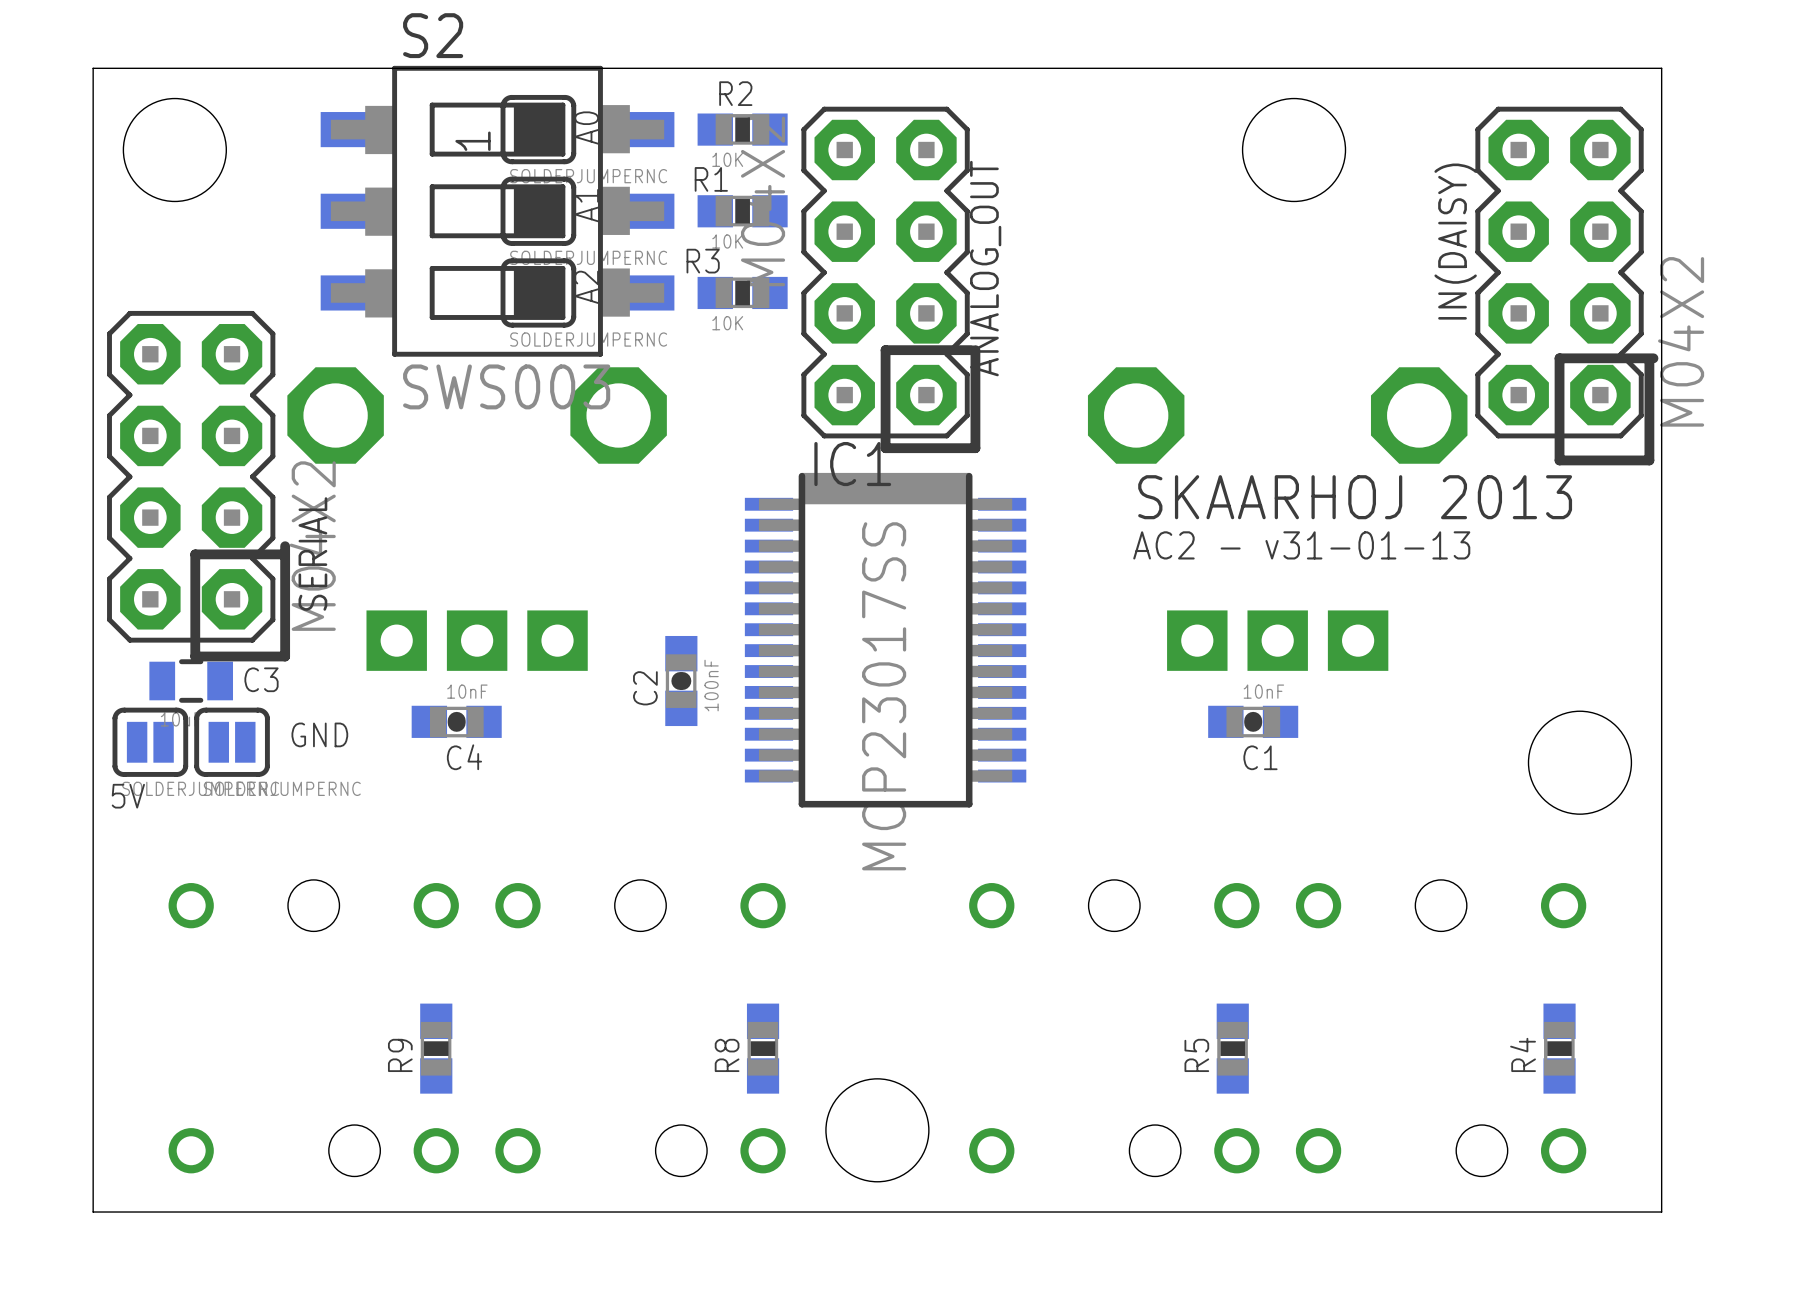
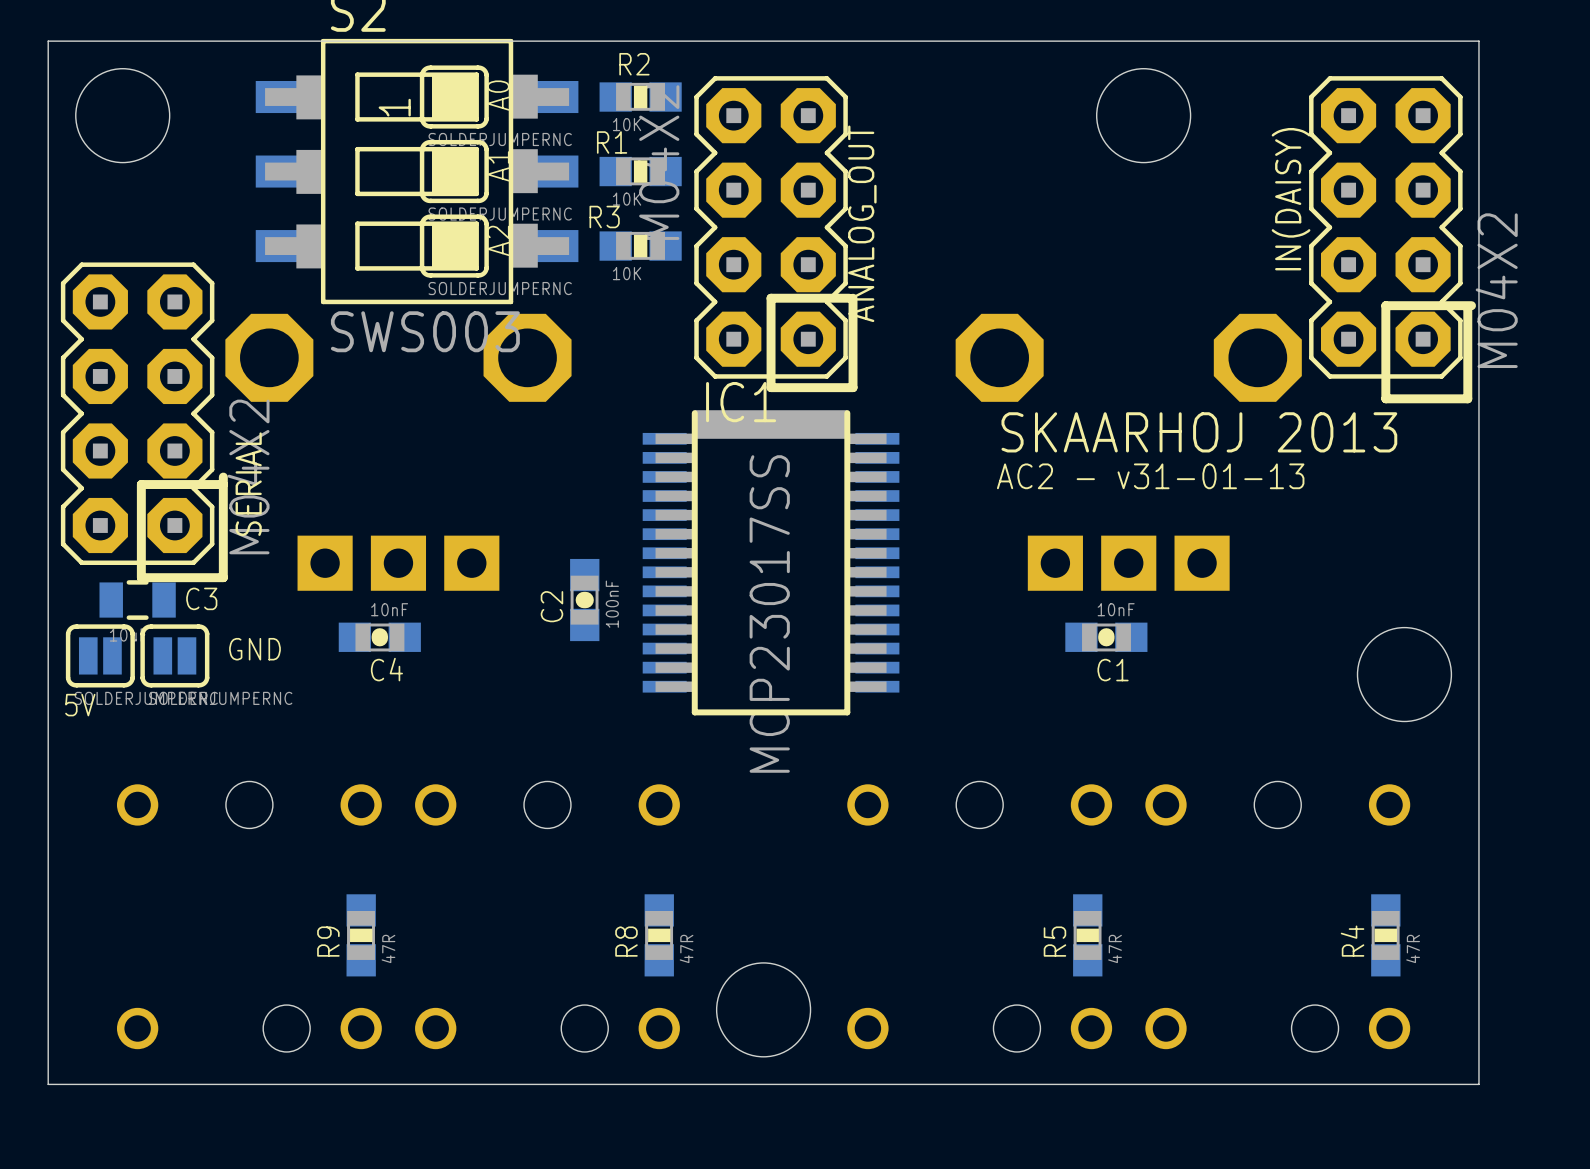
R9 value: none -> 47R (388, 948)
R8 value: none -> 47R (686, 948)
R5 value: none -> 47R (1115, 948)
R4 value: none -> 47R (1413, 948)

